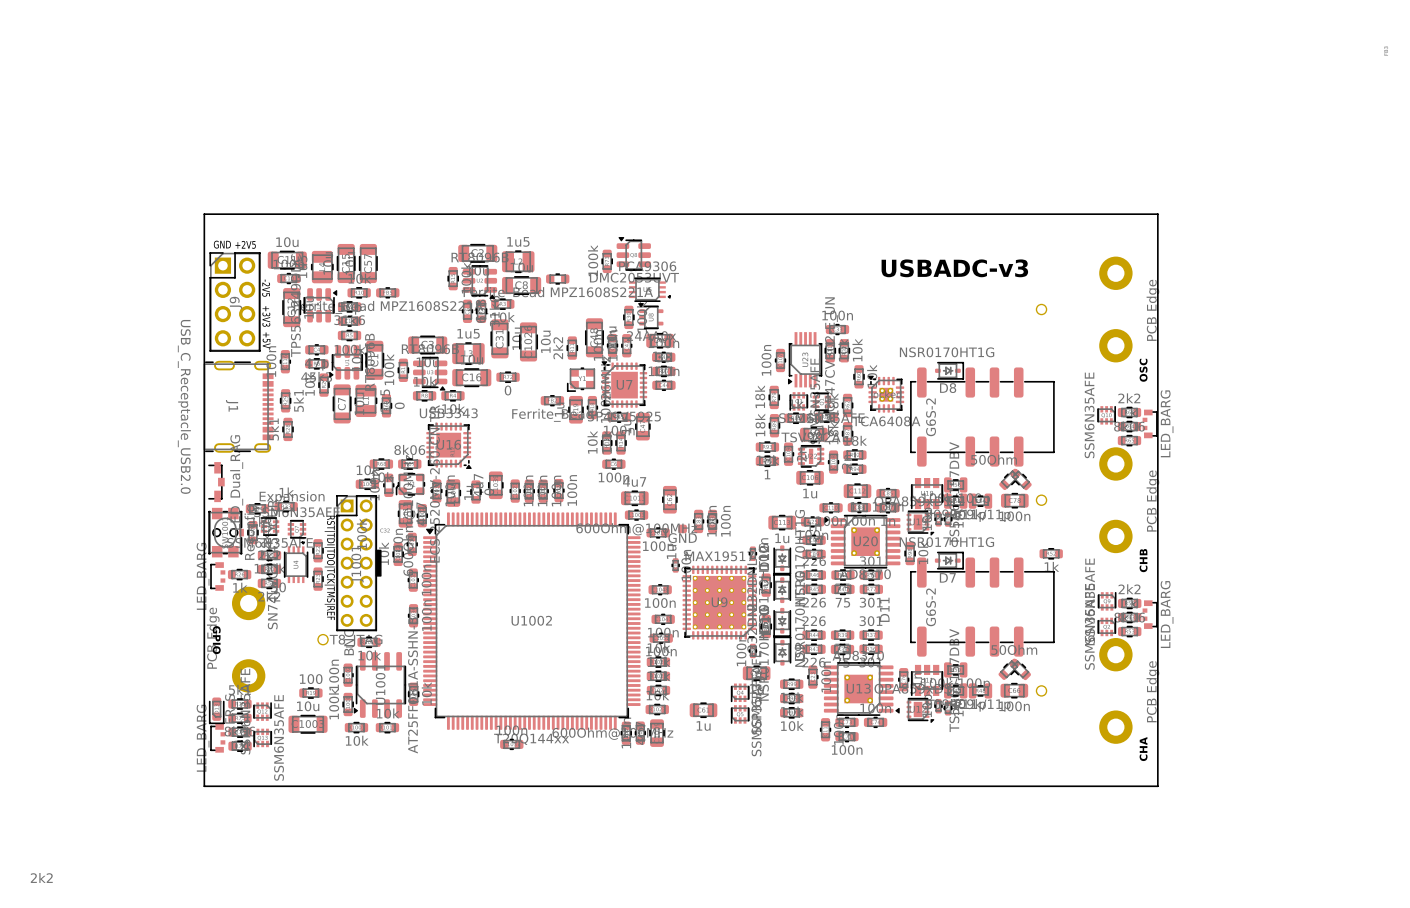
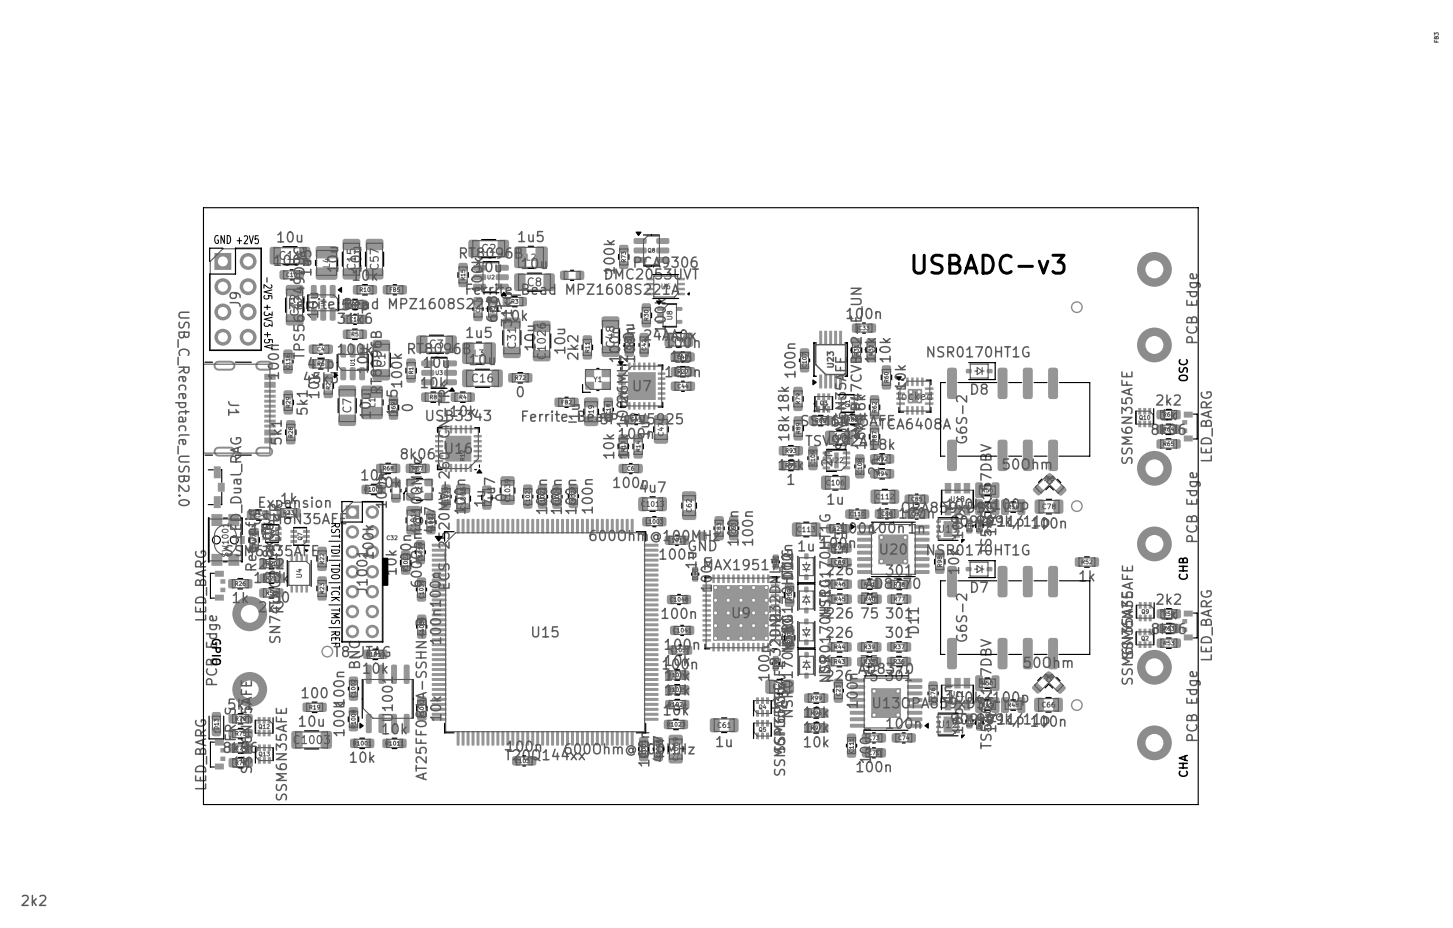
U1002 name: U1002 (531, 620) -> U15 (545, 631)

